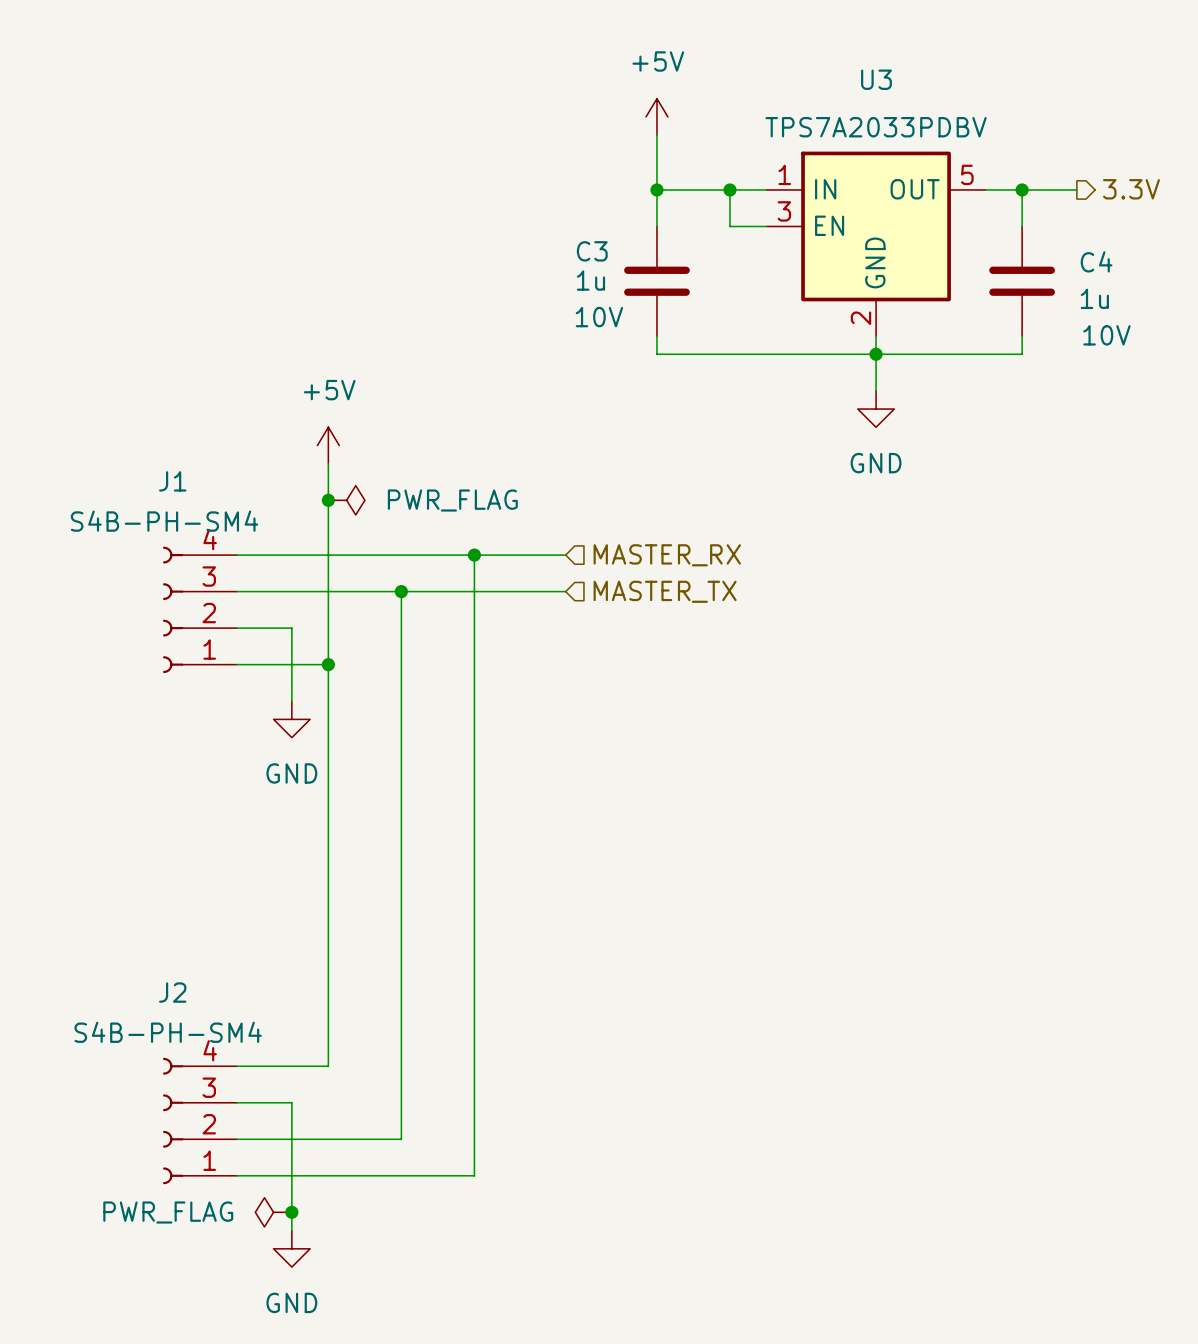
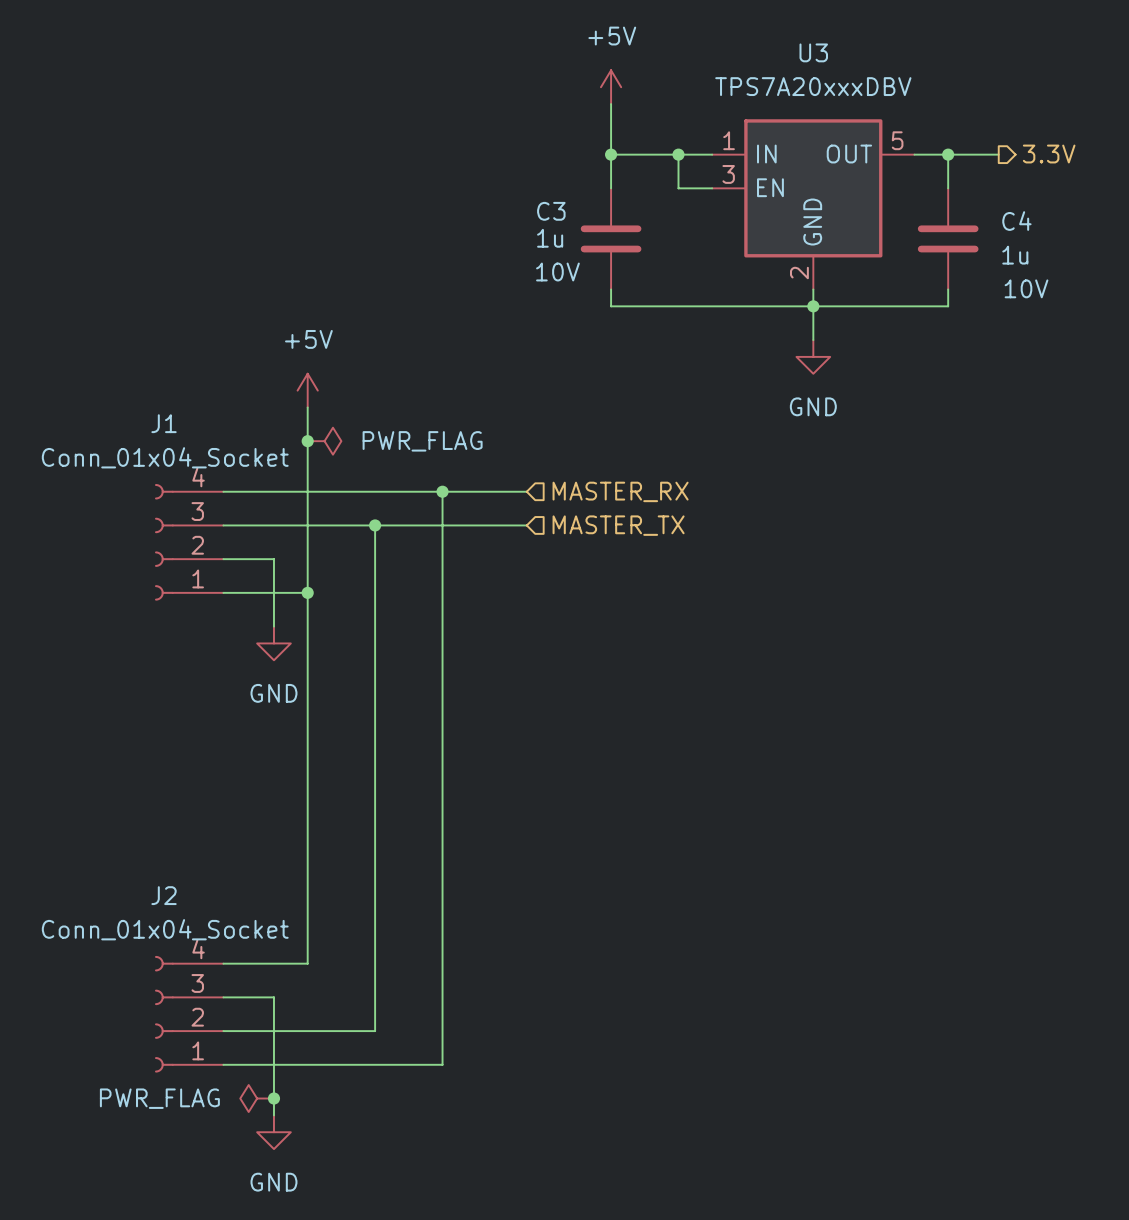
U3 value: none -> TPS7A20xxxDBV (813, 86)
U3 text: TPS7A2033PDBV (876, 127) -> none
J1 value: none -> Conn_01x04_Socket (165, 457)
J1 text: S4B-PH-SM4 (164, 521) -> none
J2 value: none -> Conn_01x04_Socket (165, 929)
J2 text: S4B-PH-SM4 (168, 1032) -> none

